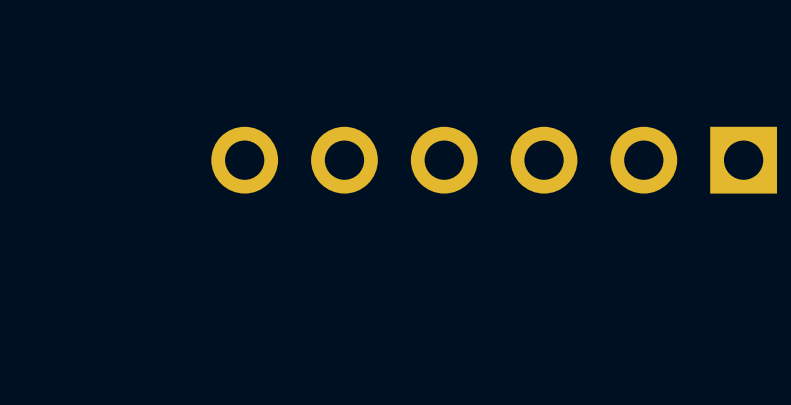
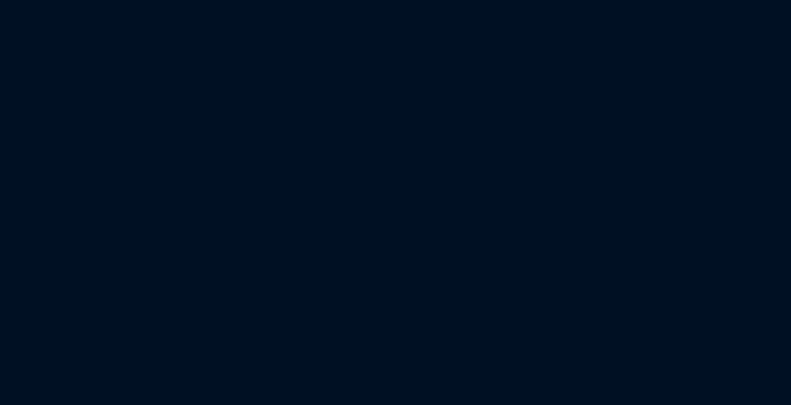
part: (494, 160) -> none

